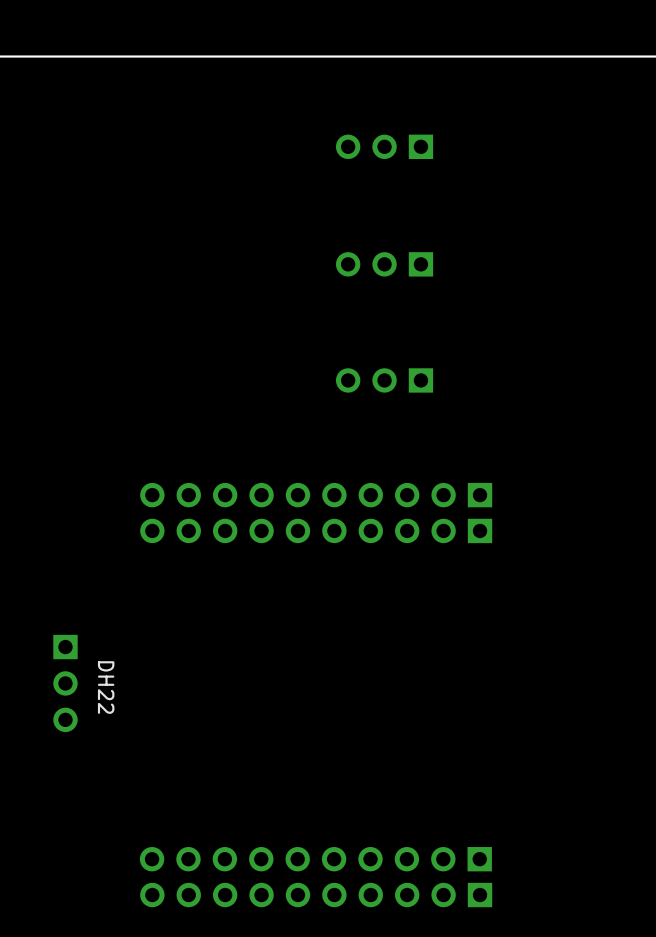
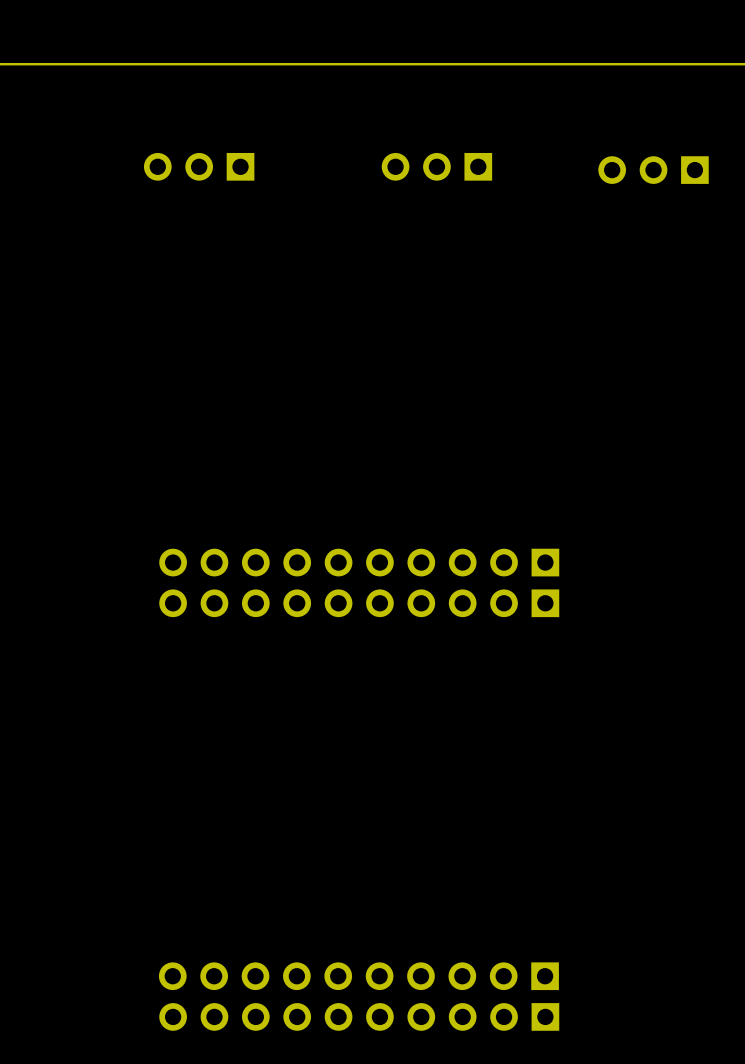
part: none -> (199, 166)
part: none -> (653, 170)
part: (384, 264) -> none
part: (384, 380) -> none
part: DH22 (65, 683) -> none

